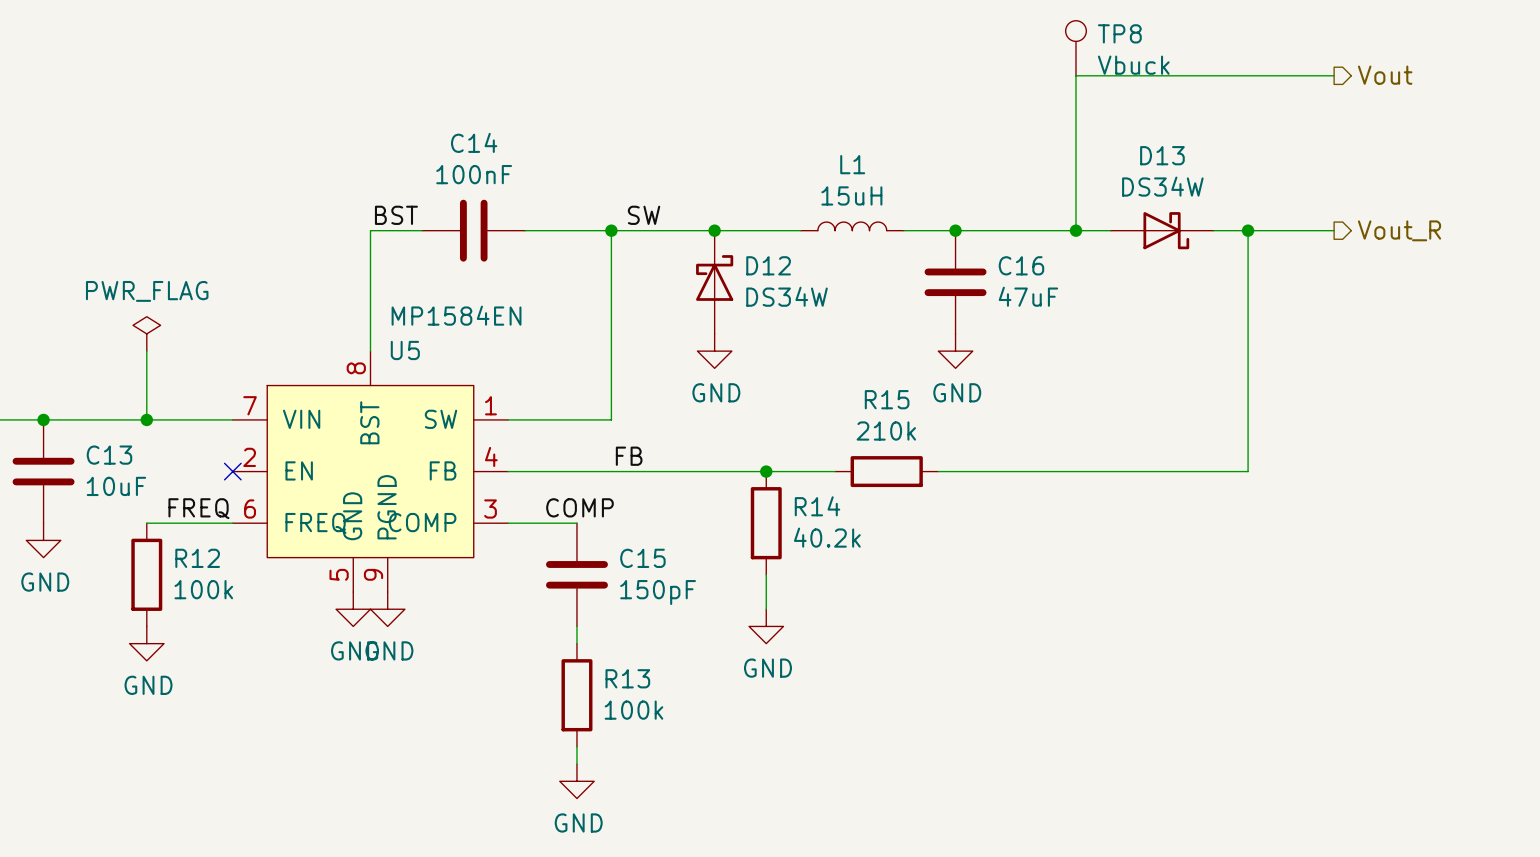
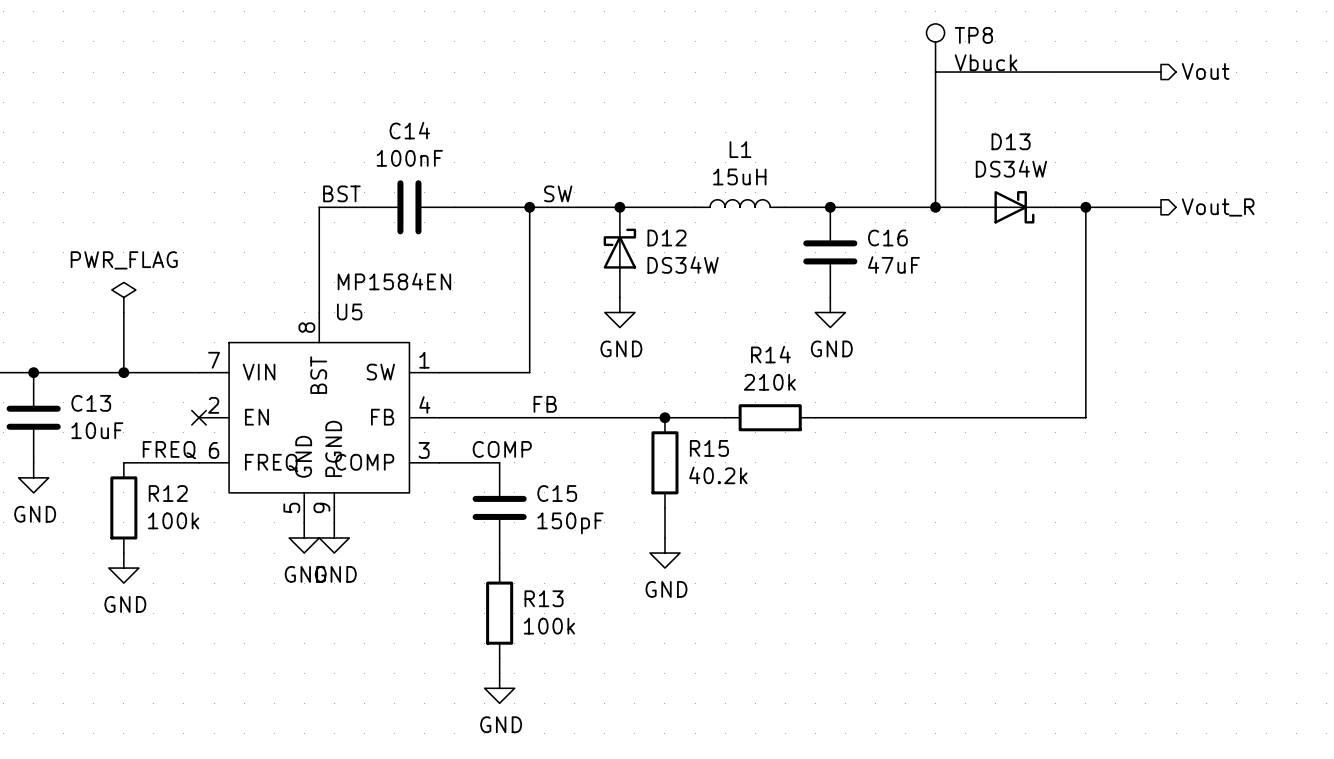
R15 name: R15 (887, 399) -> R14 (770, 354)
R14 name: R14 (817, 506) -> R15 (709, 448)

